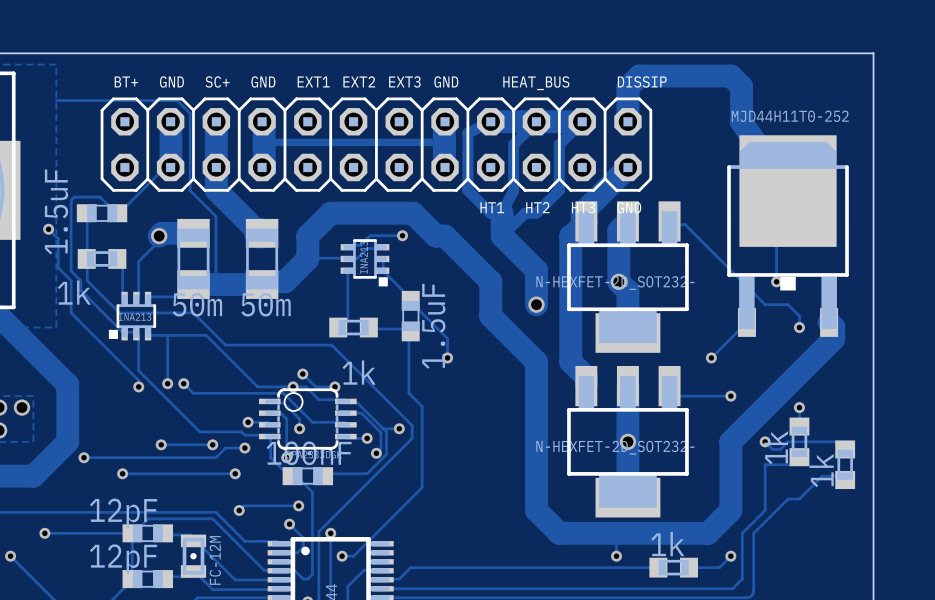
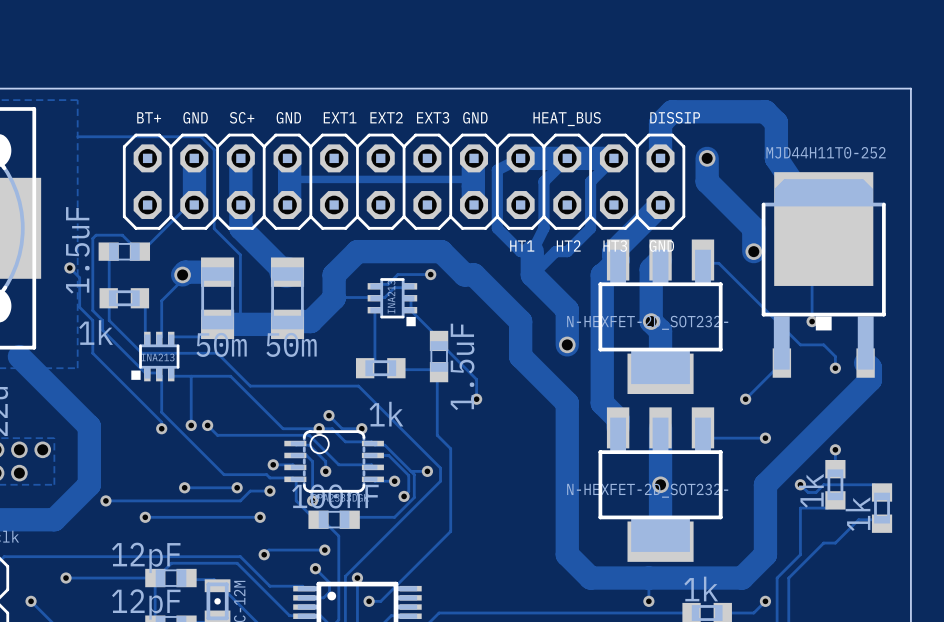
track: none -> (707, 158) (707, 181) (753, 228) (753, 251)
via: none -> (707, 158)
via: none -> (753, 251)

